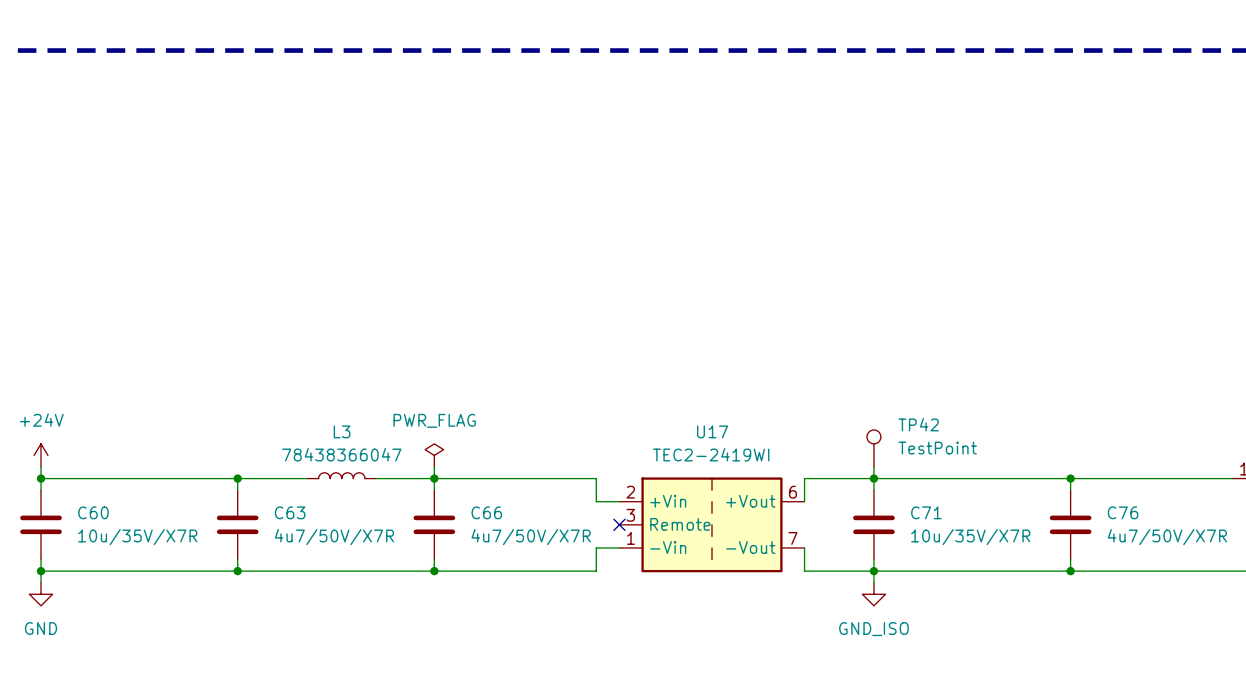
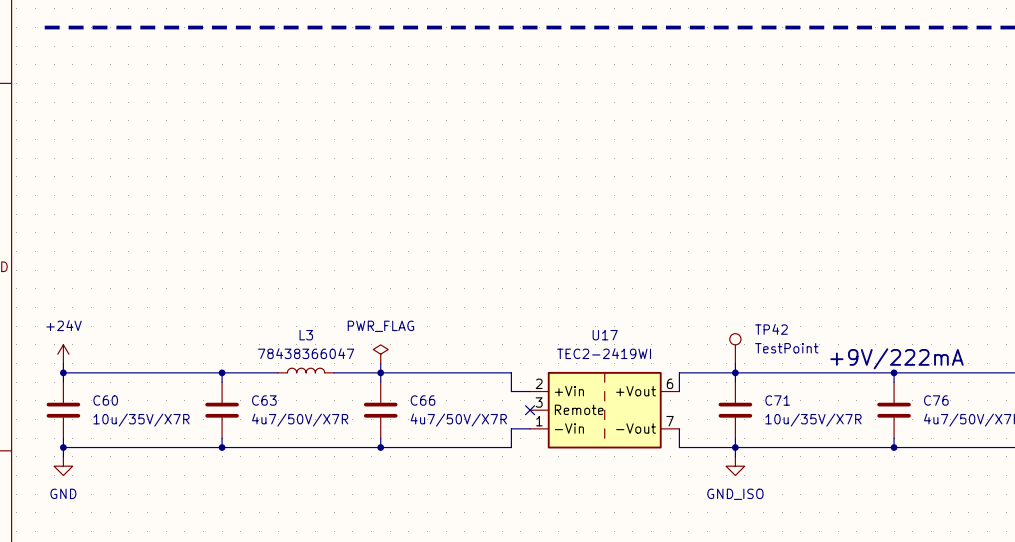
text: none -> +9V/222mA (896, 358)

